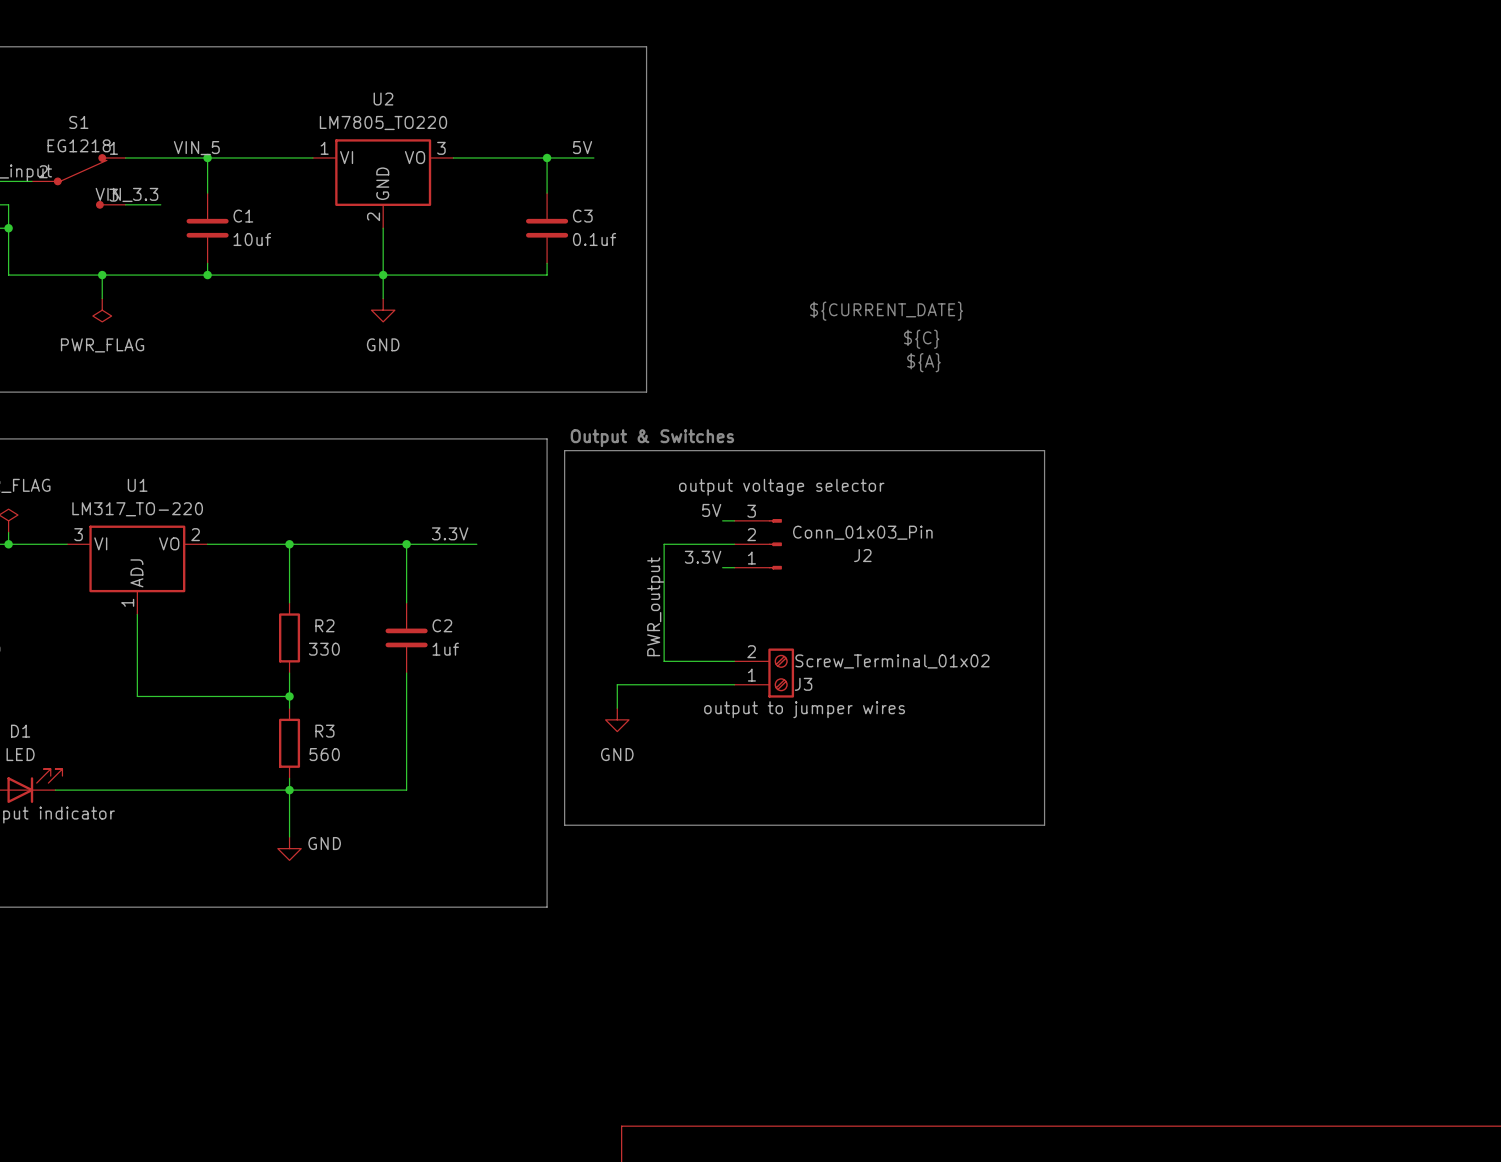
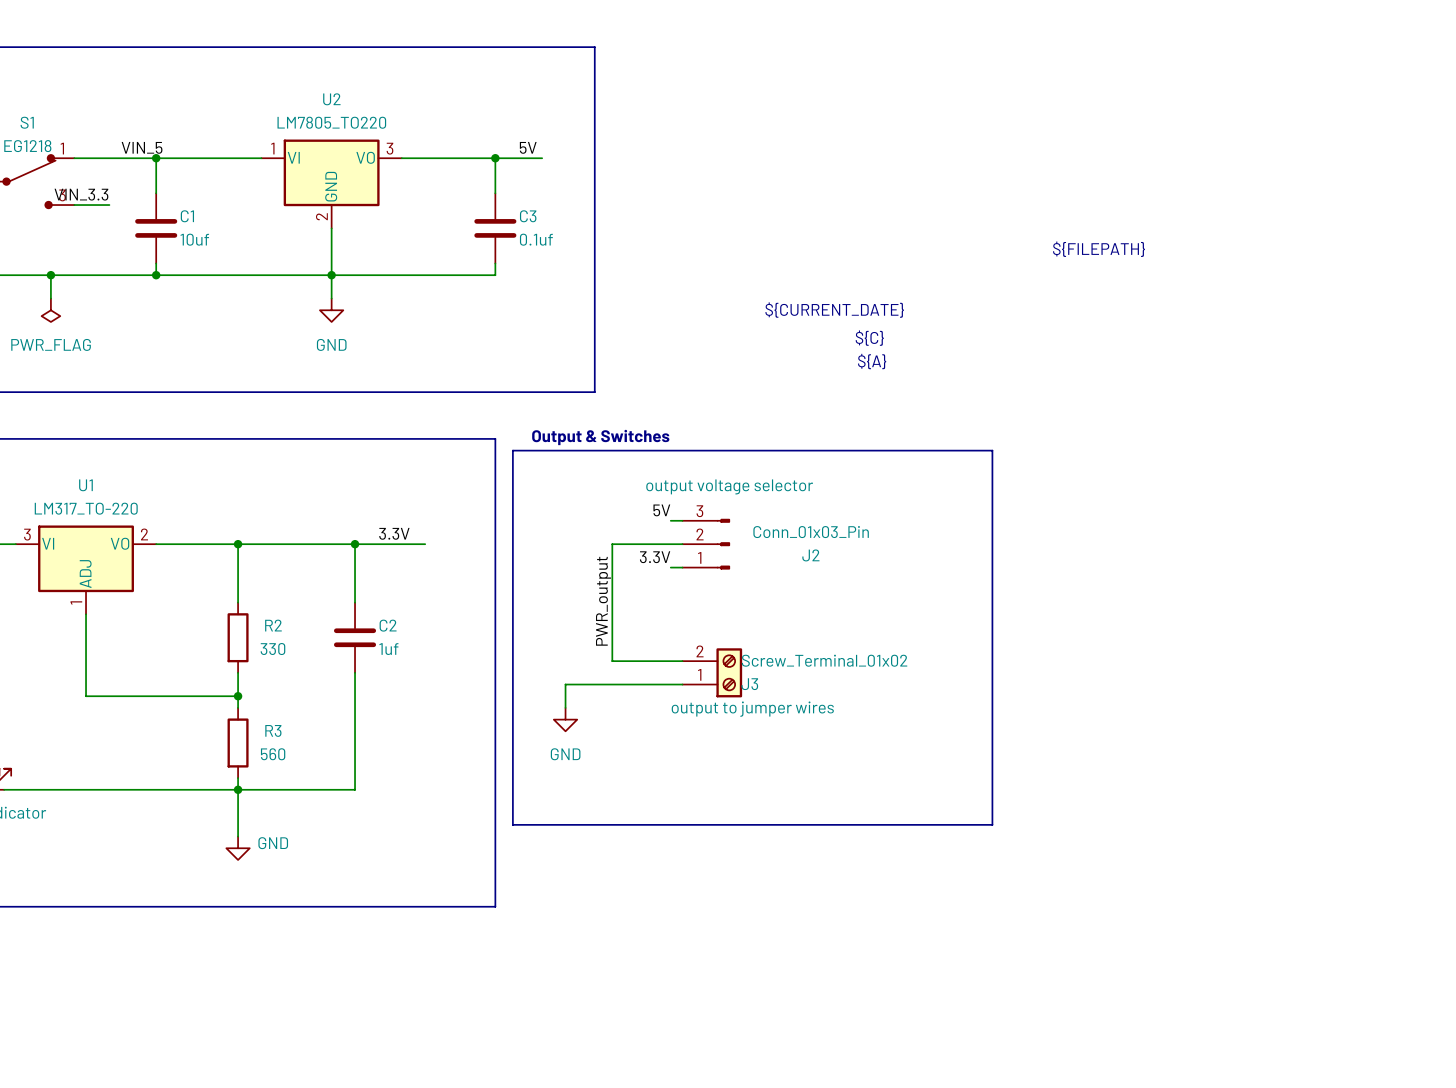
text: none -> ${FILEPATH} (1099, 249)

